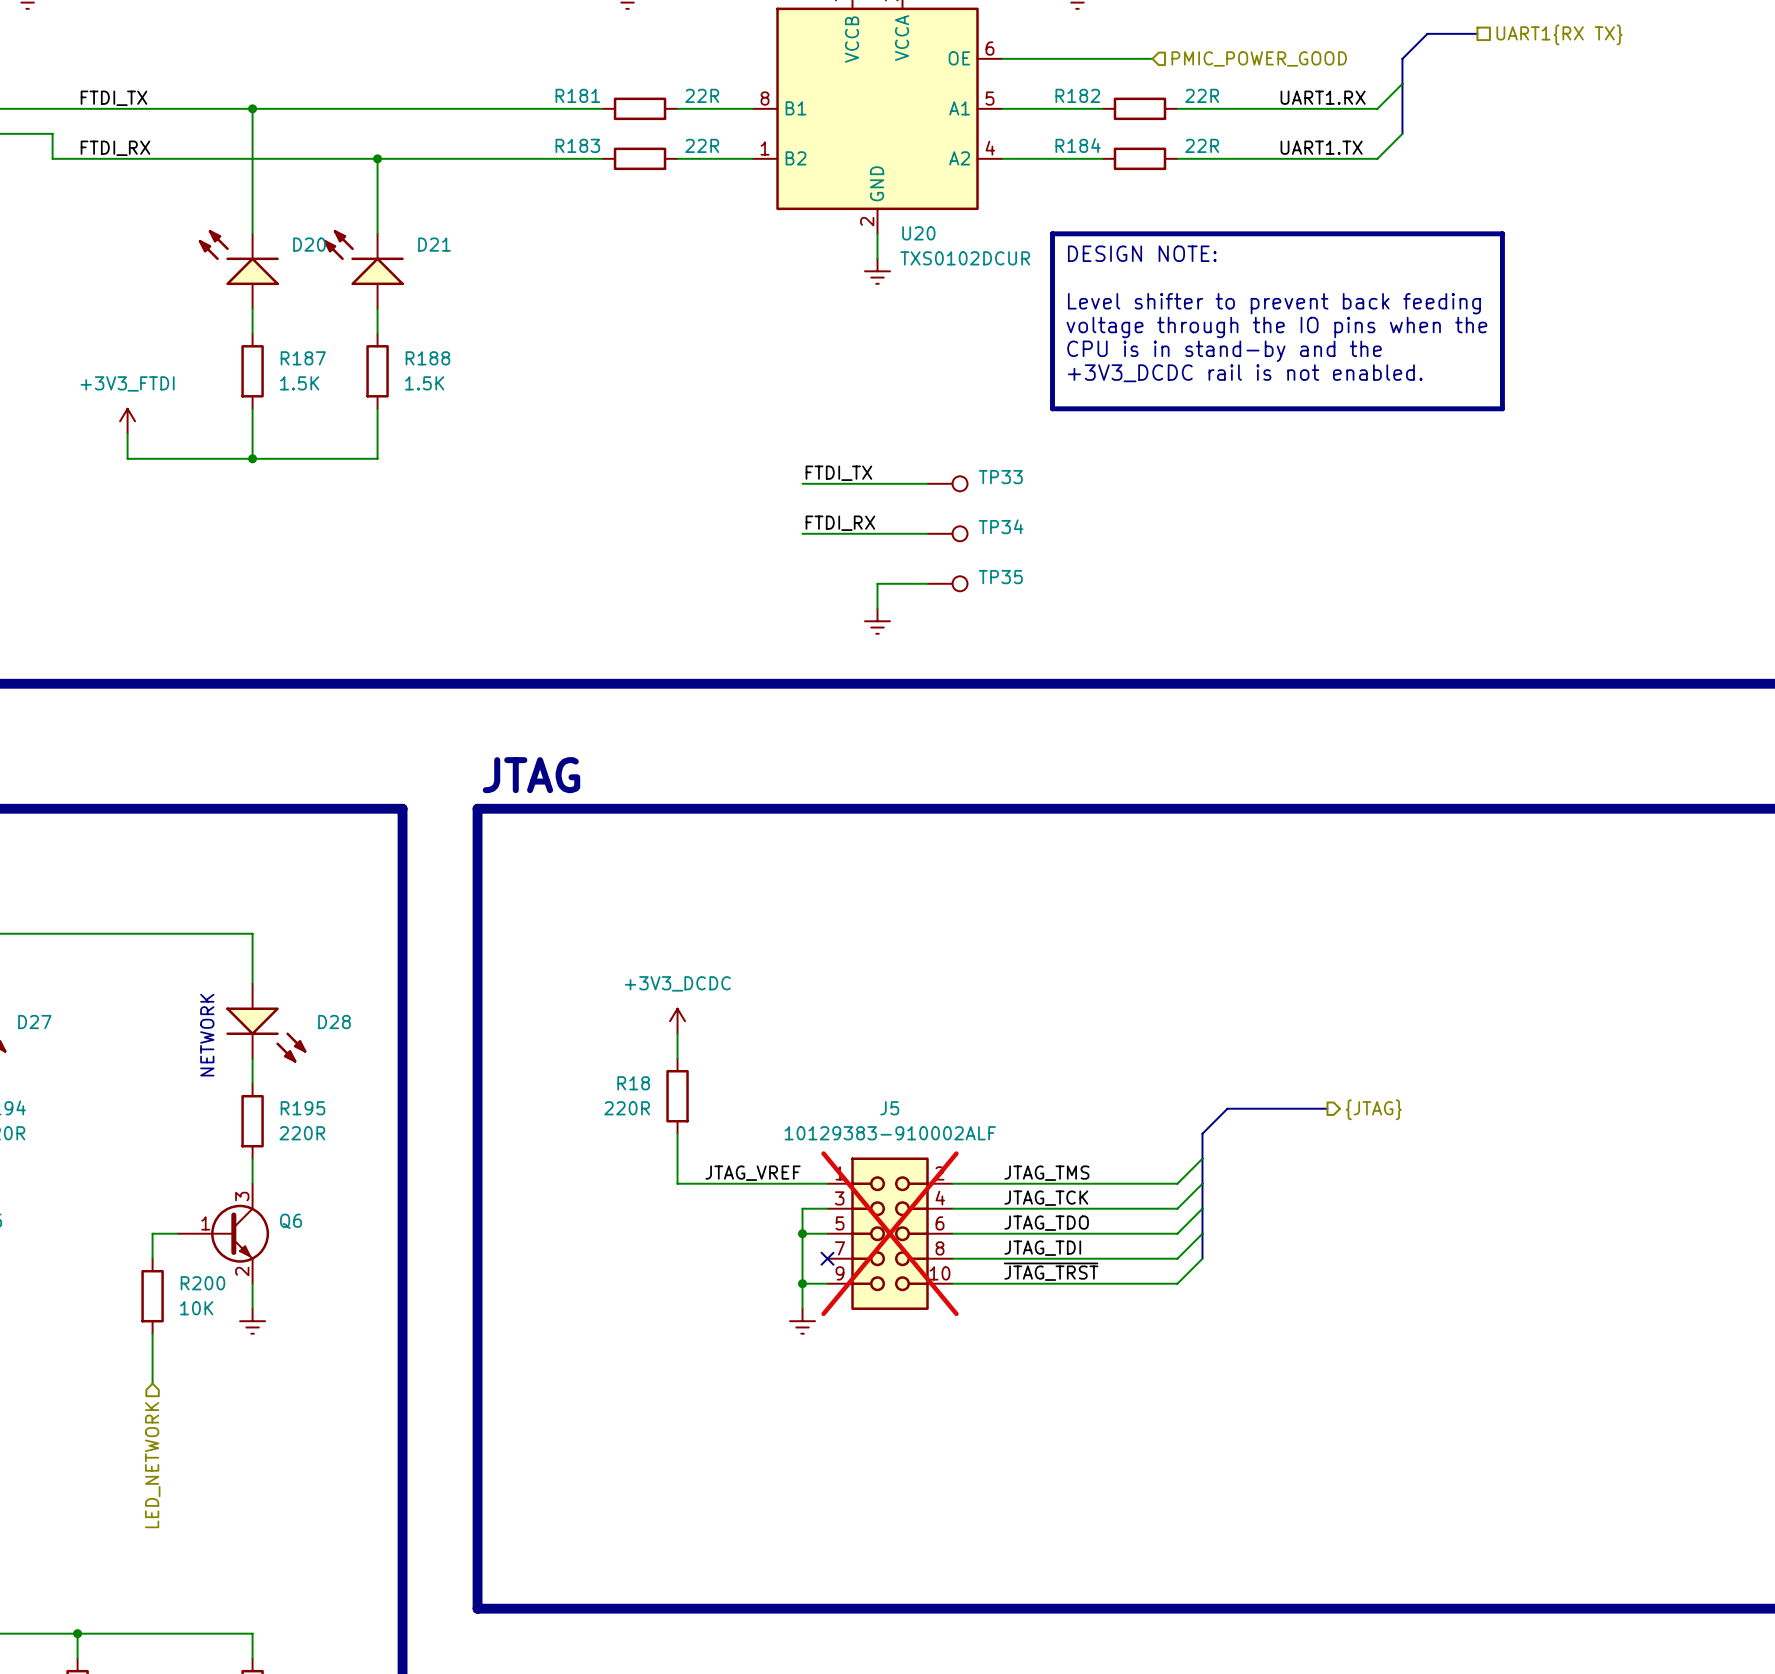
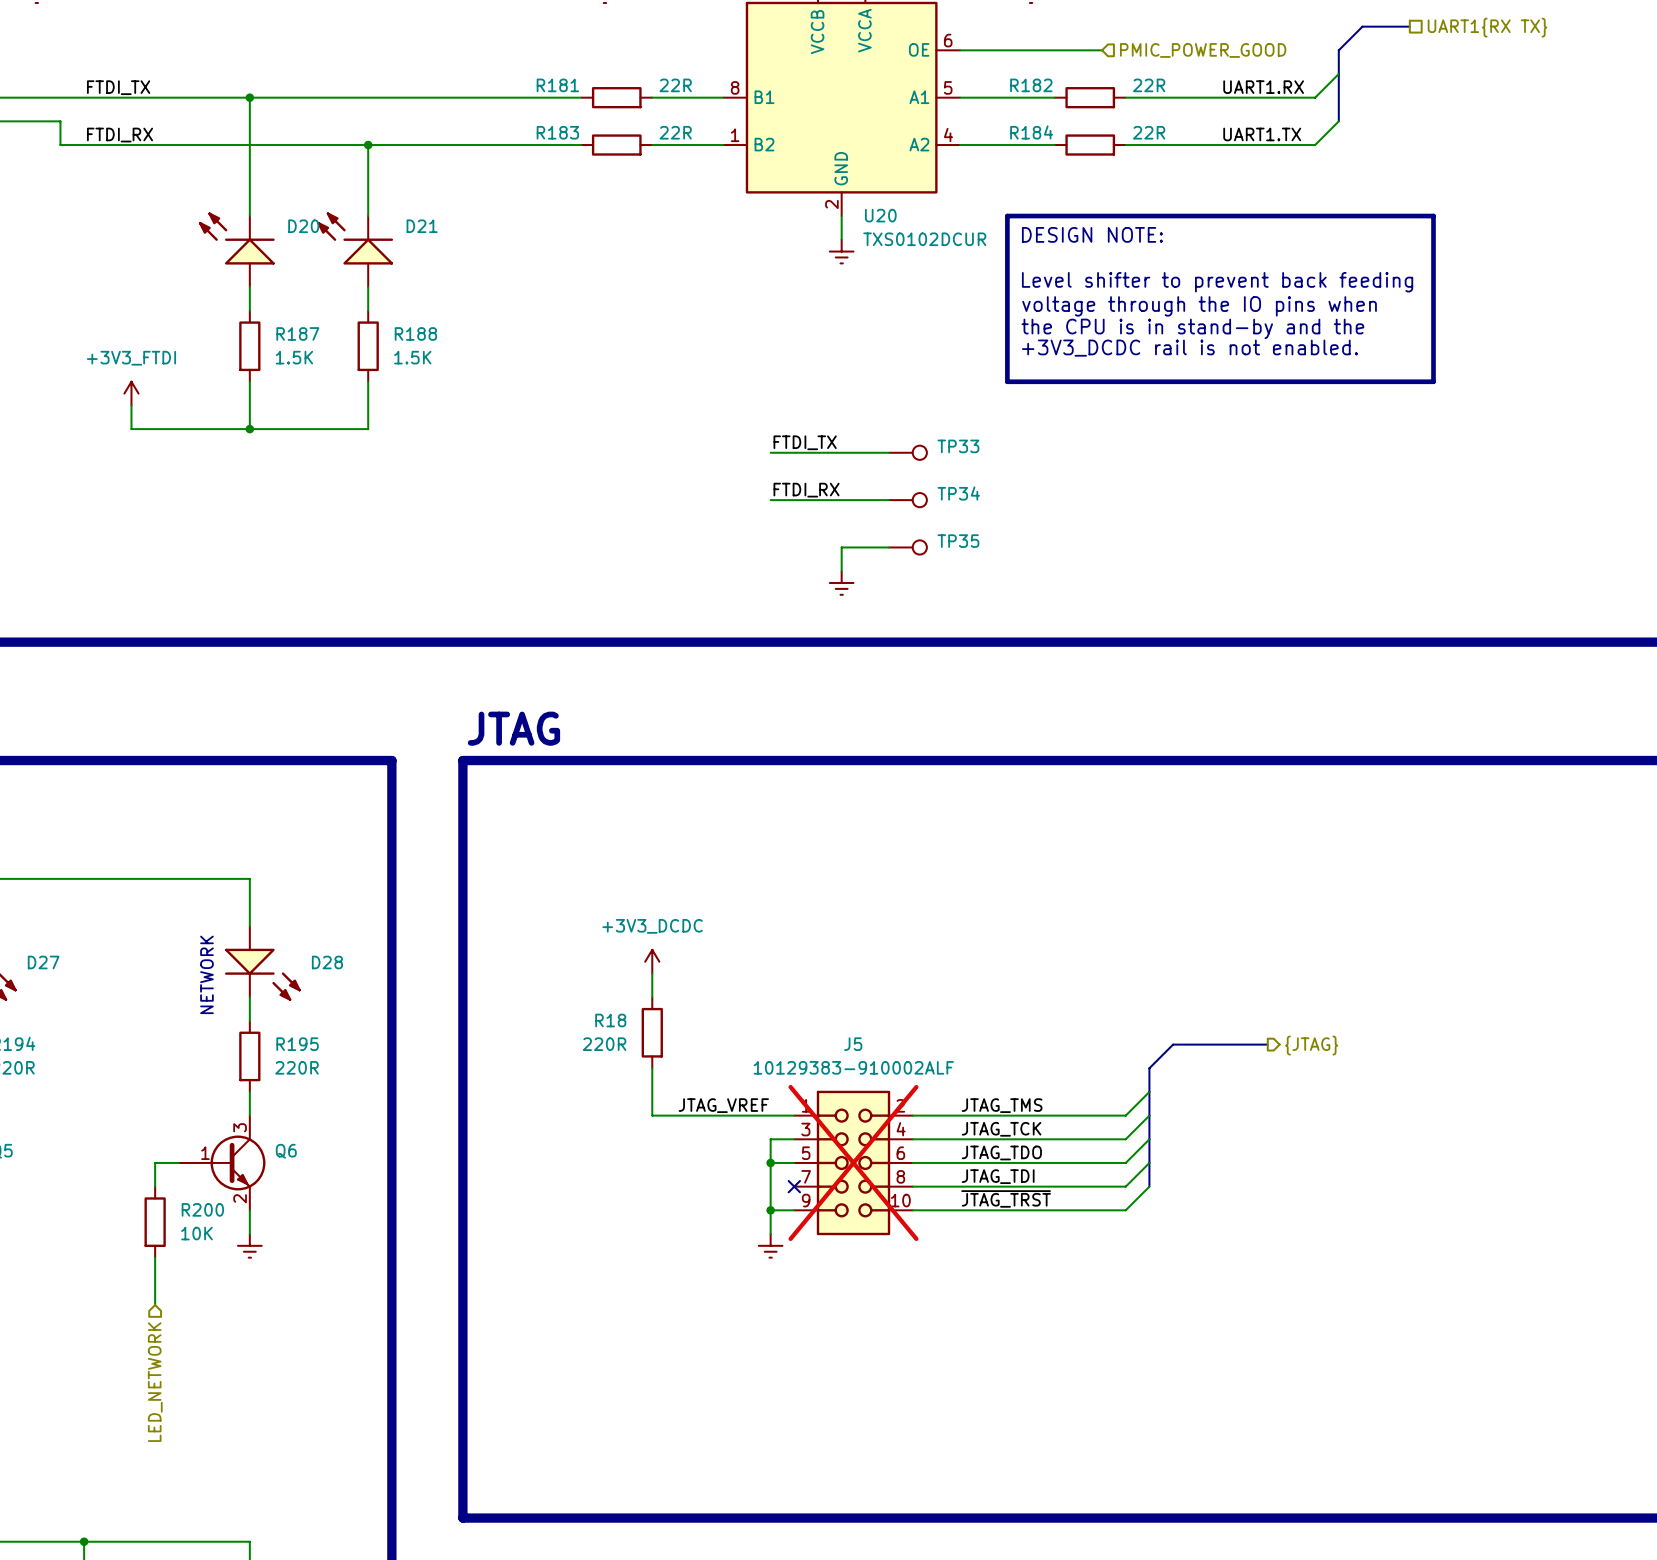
text: voltage through the IO pins when the (1276, 327) -> voltage through the IO pins when (1199, 306)
text: CPU is in stand-by and the (1224, 351) -> the CPU is in stand-by and the (1192, 328)

